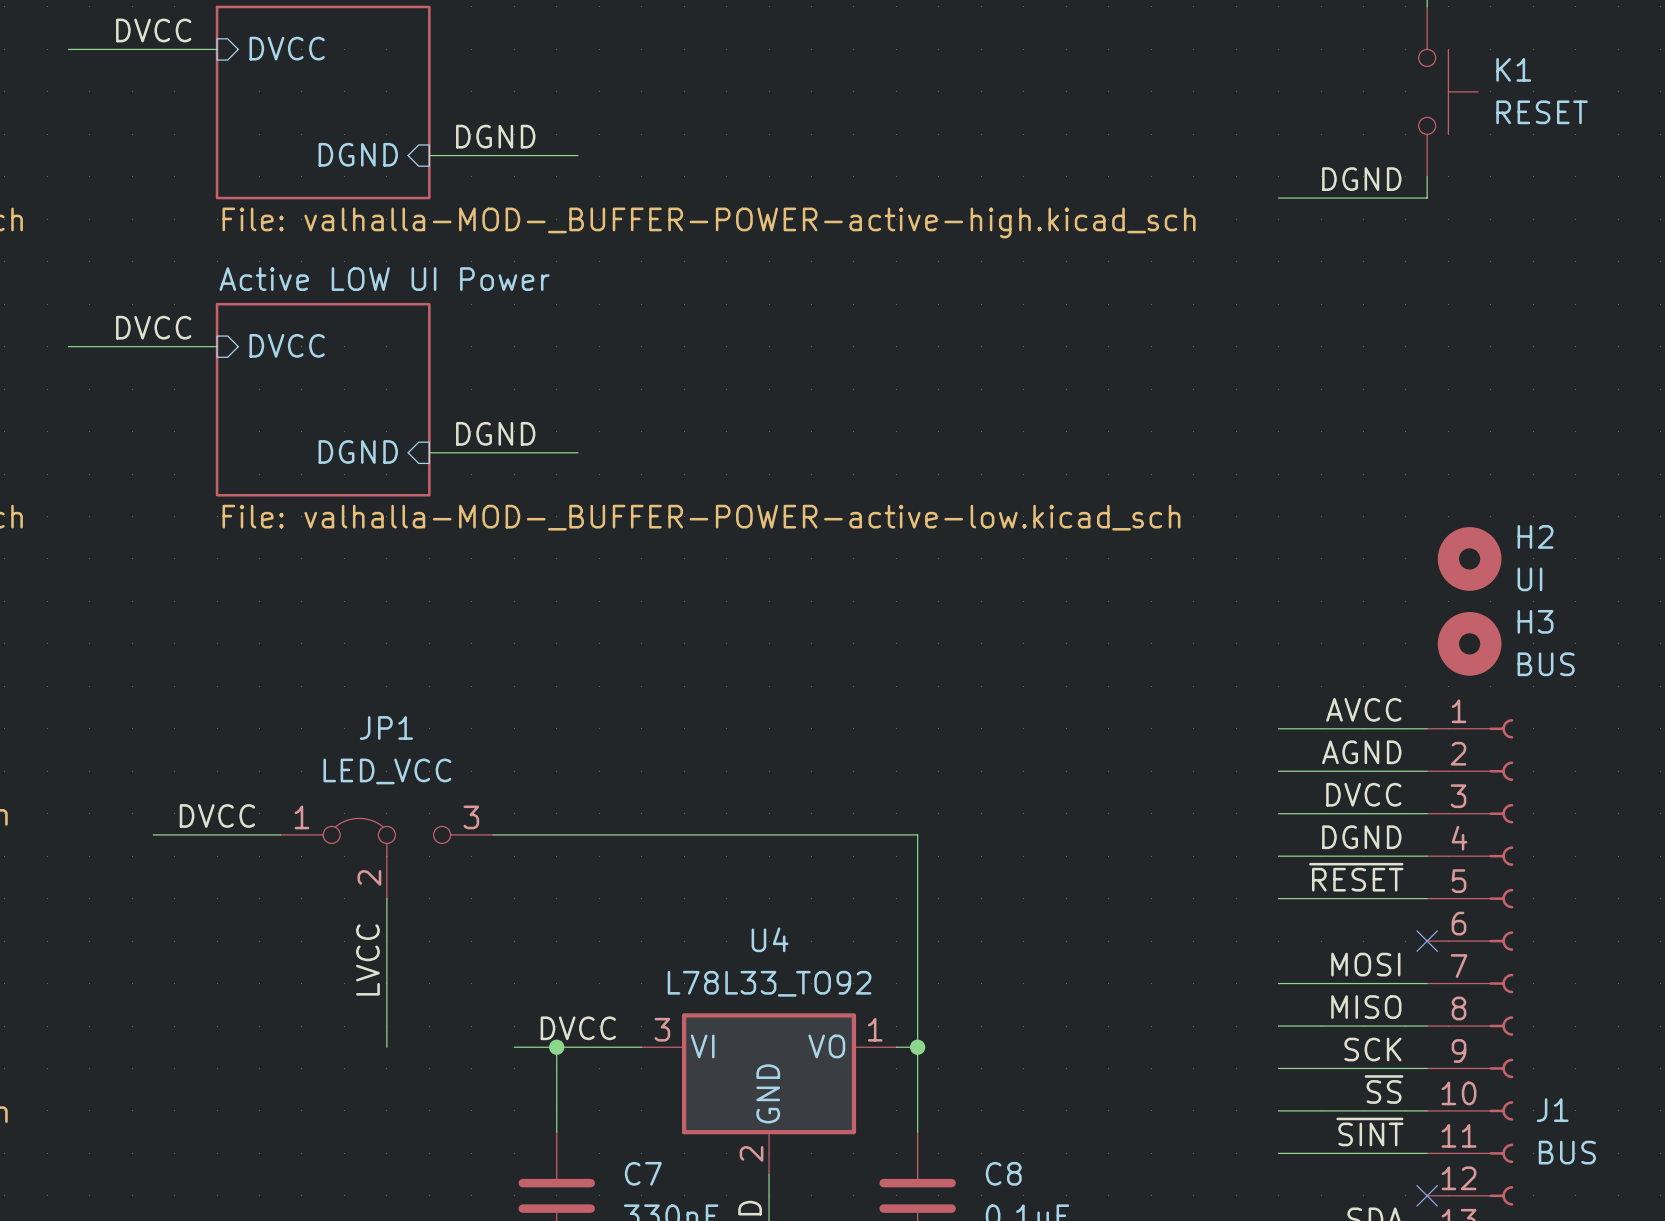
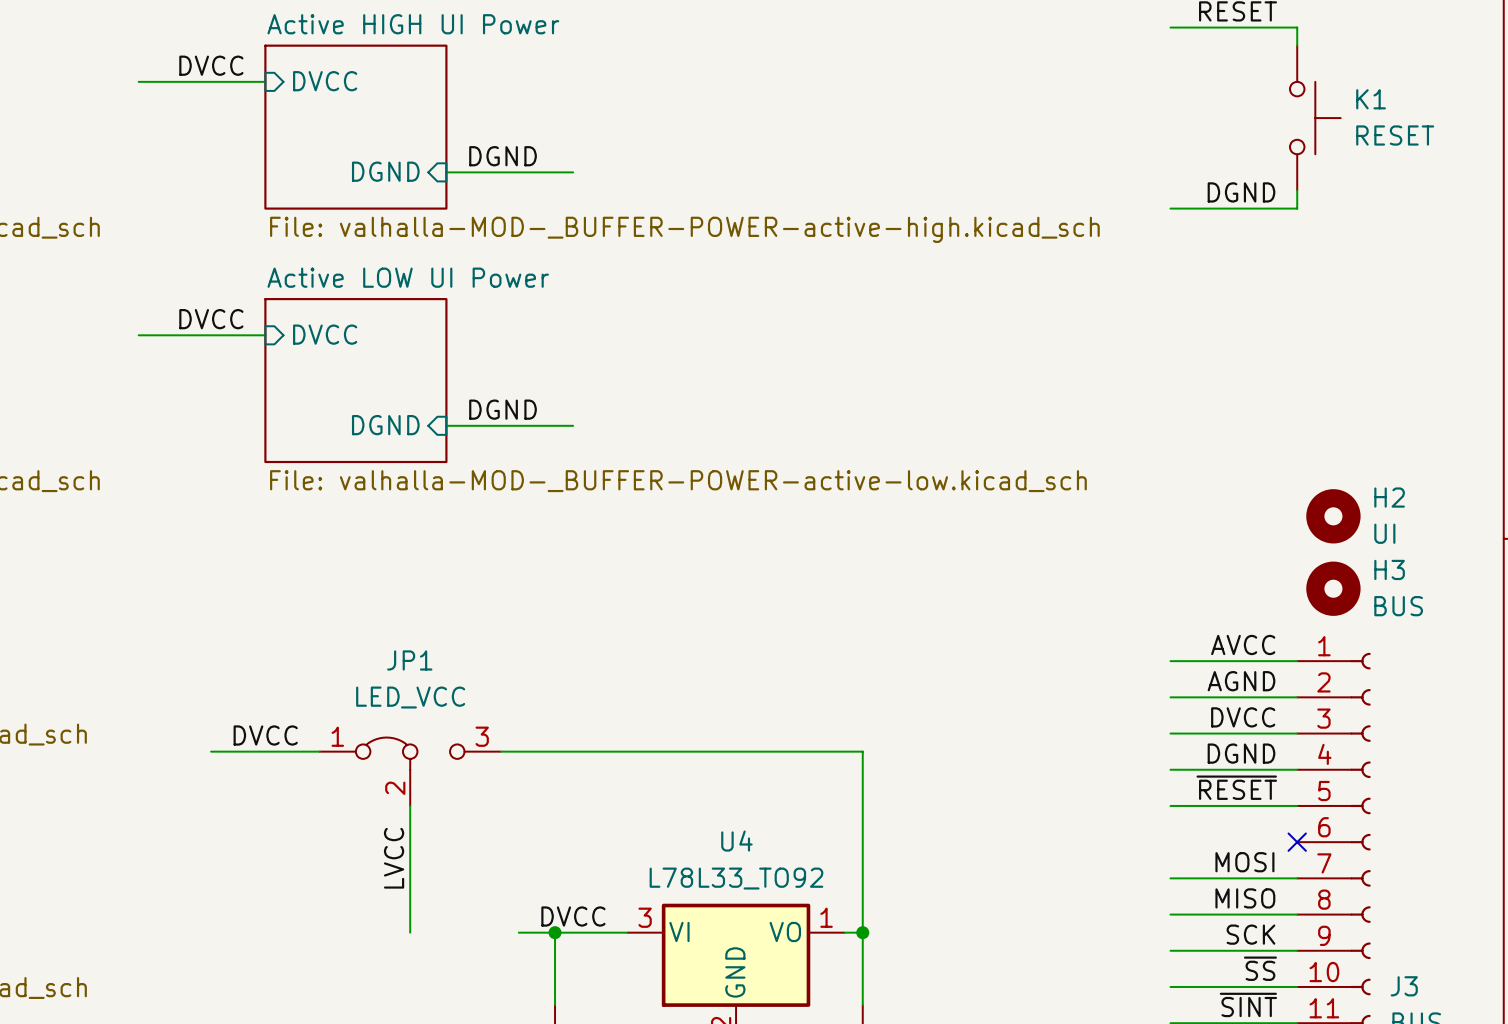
J1 name: J1 (1552, 1110) -> J3 (1404, 986)

